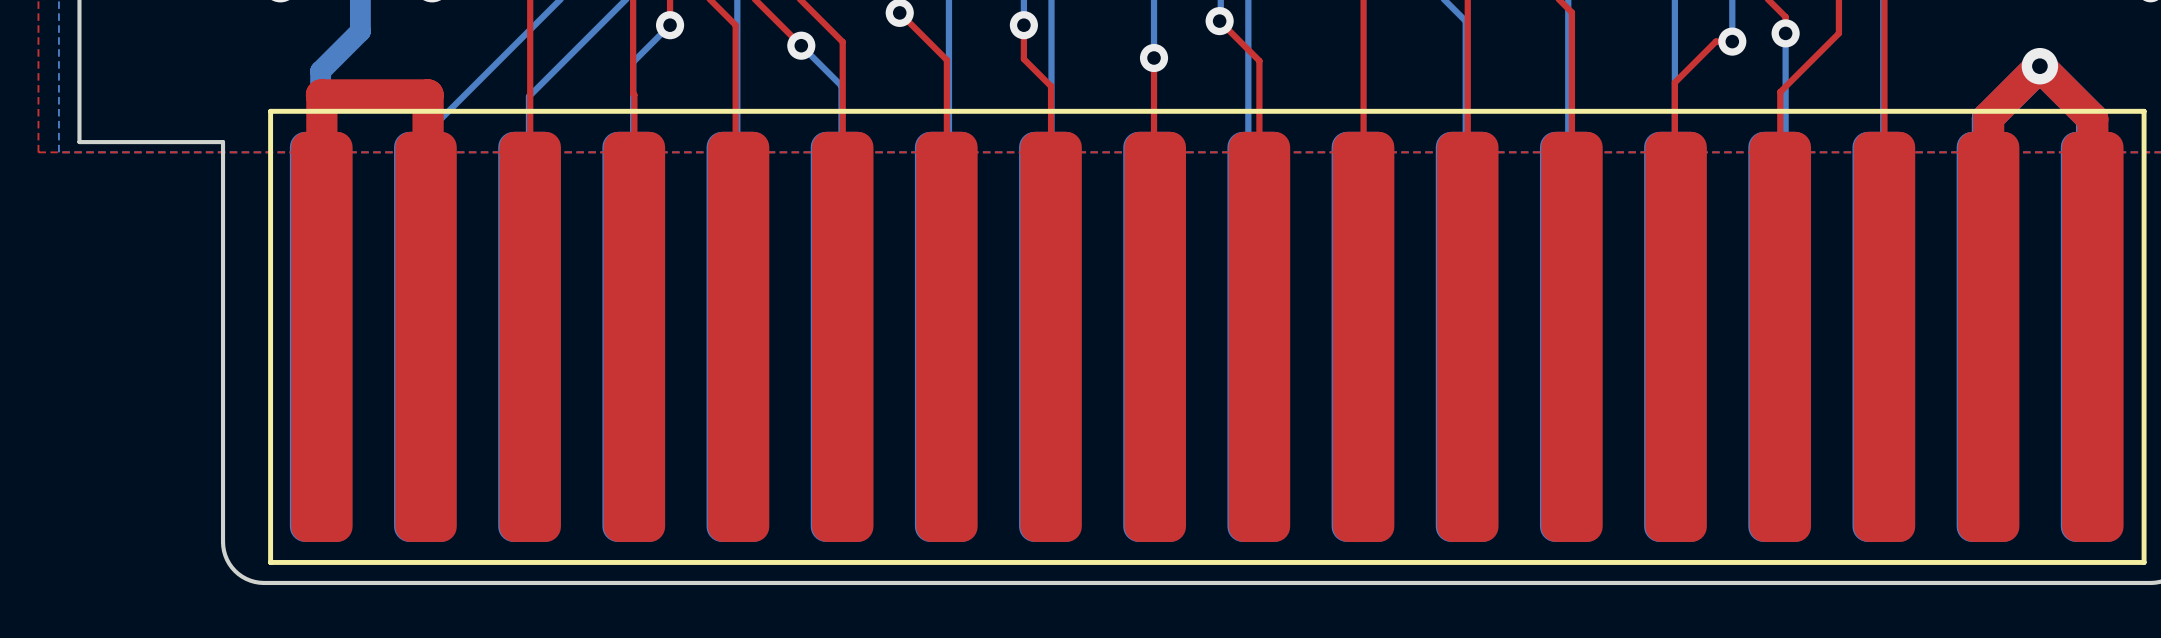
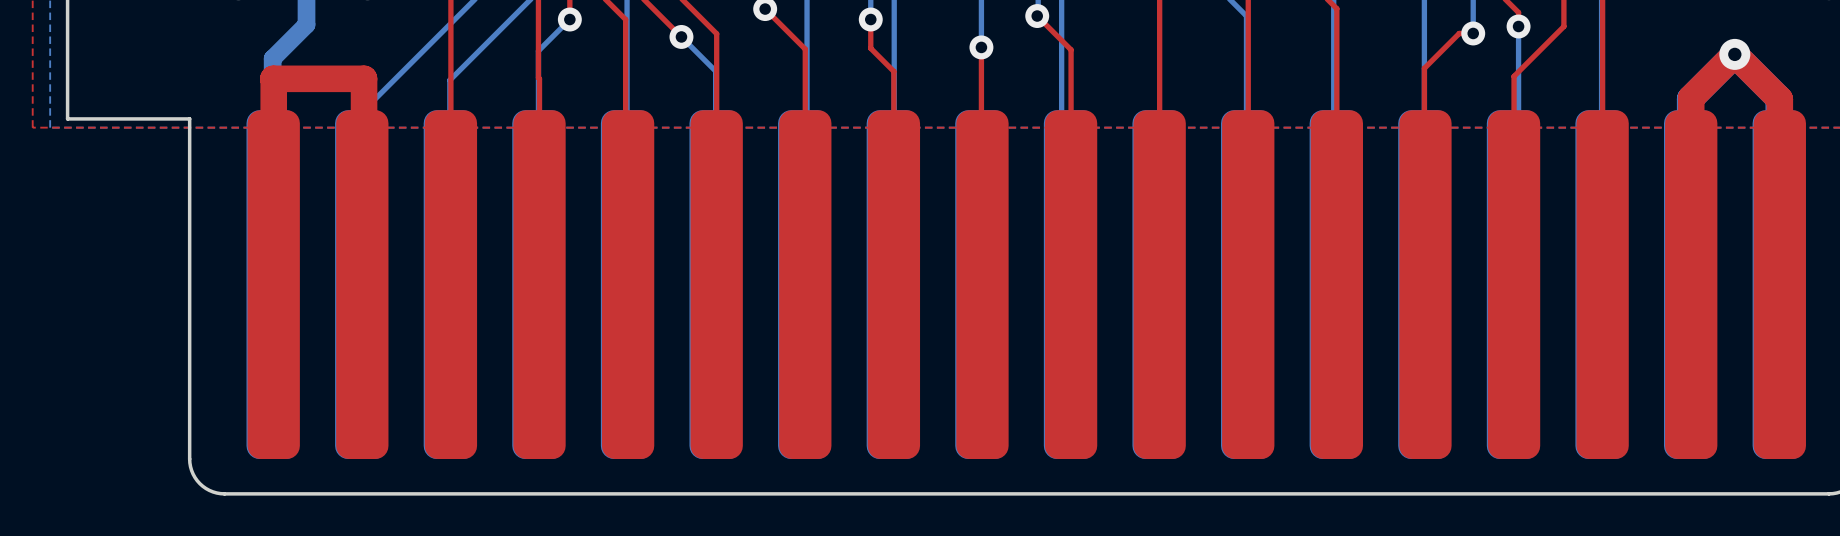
part footprint: [268, 108, 2147, 565] -> [246, 110, 1806, 460]

